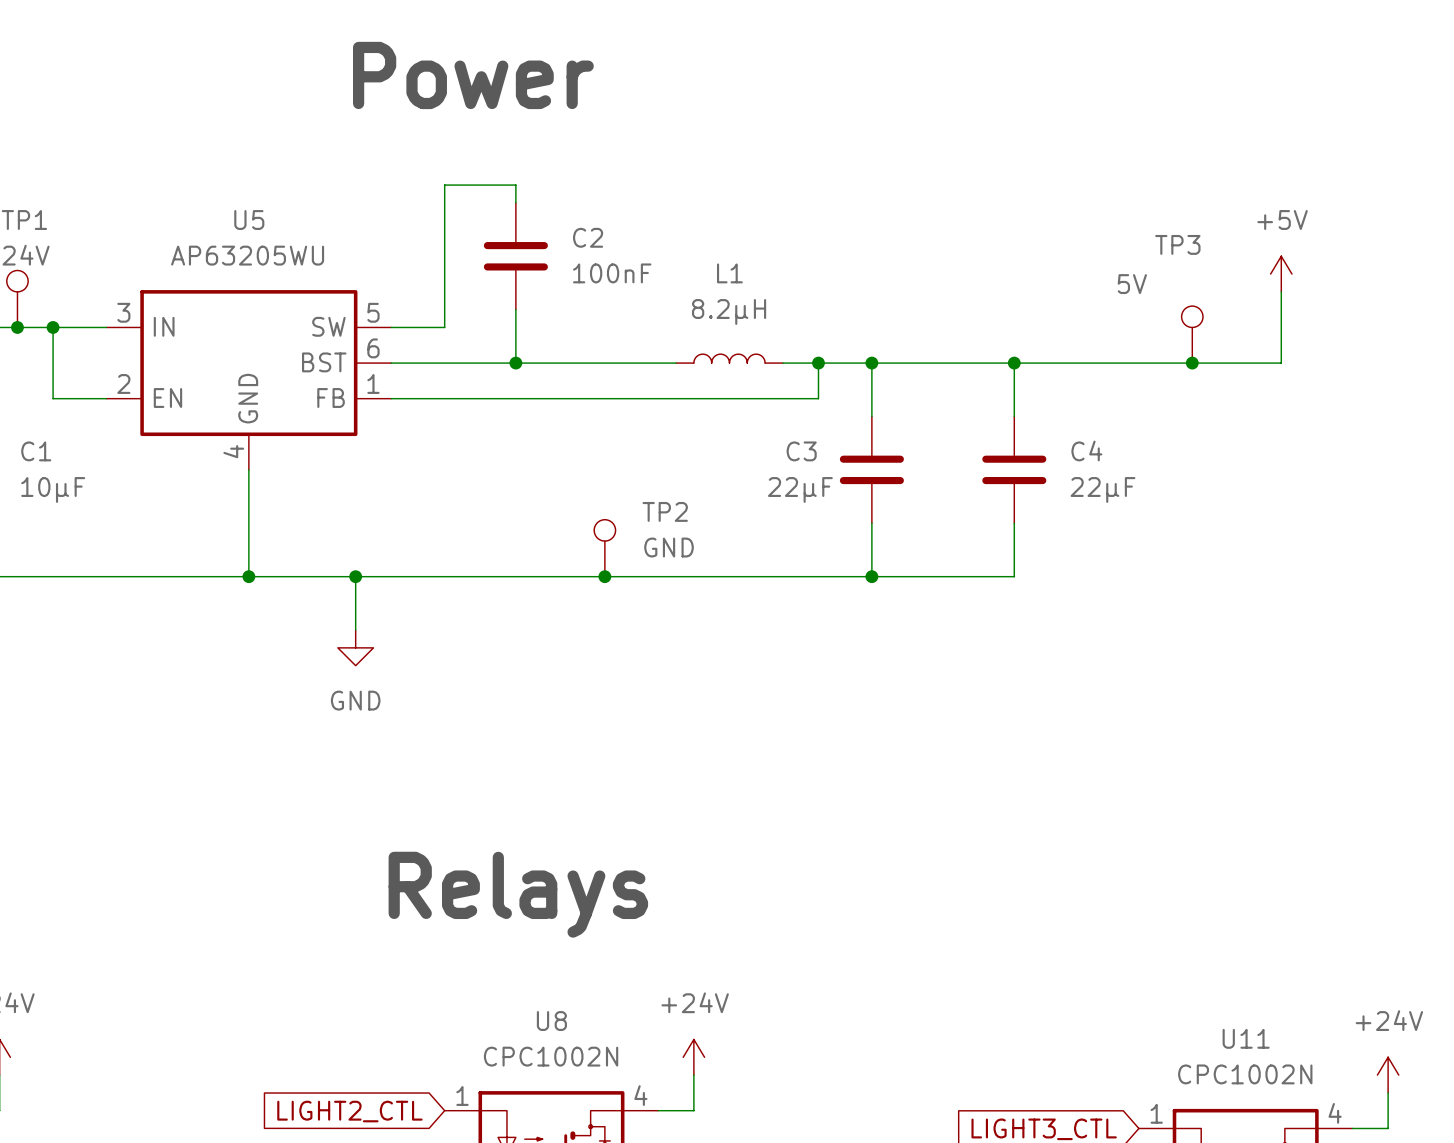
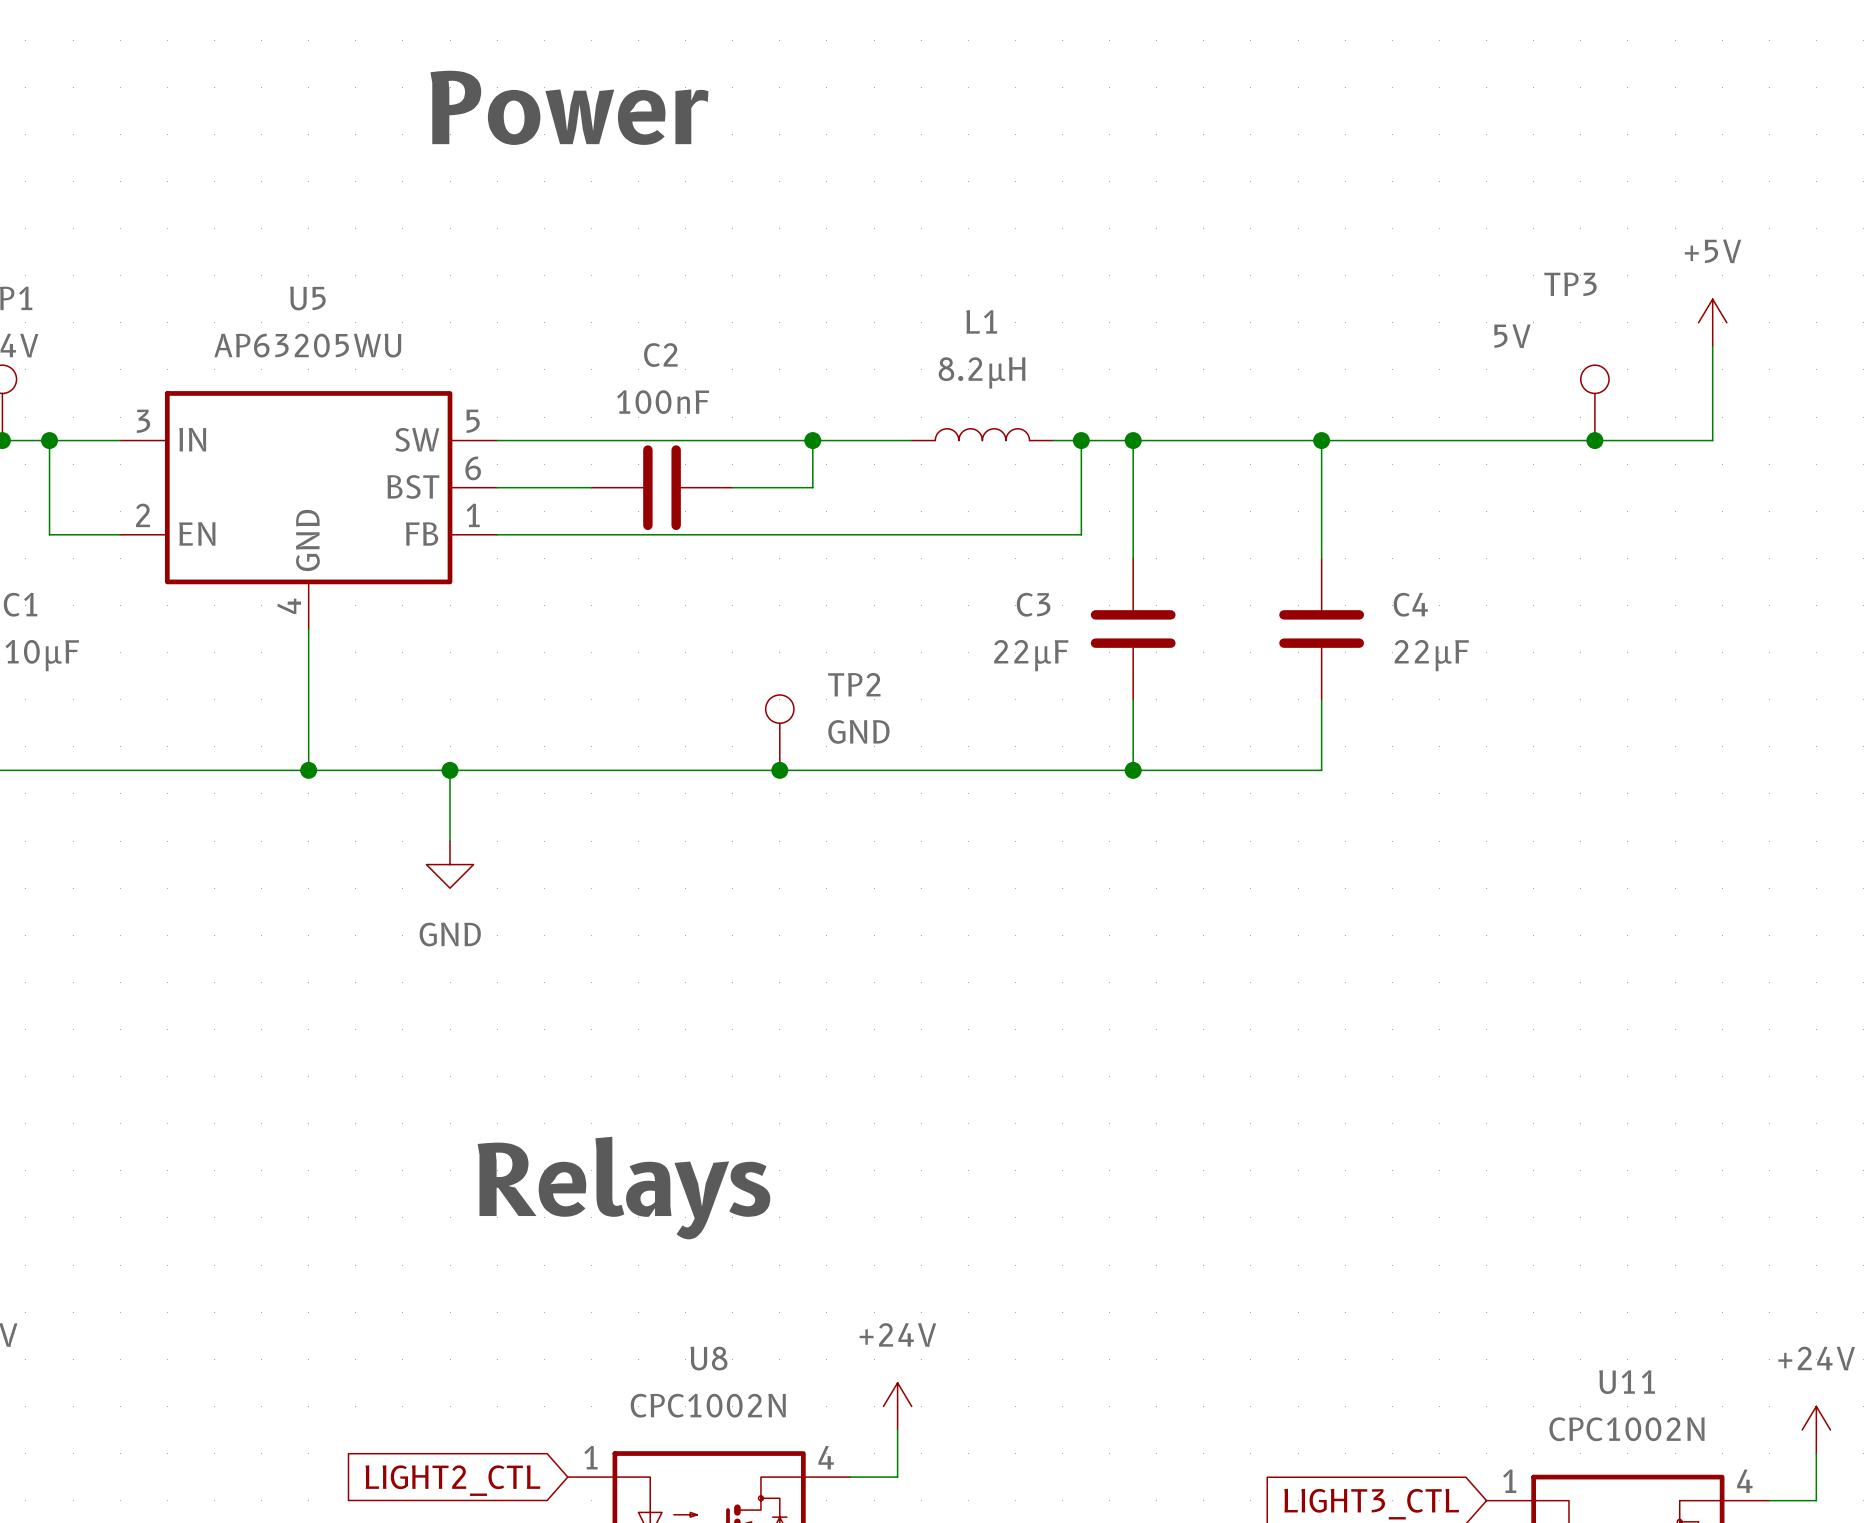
wire: (515, 202) (515, 185) (444, 185) (444, 327) -> (911, 440) (567, 440)
C2 name position: C2 (588, 237) -> C2 (660, 355)
C2 rotation: 0° (515, 256) -> 90° clockwise (662, 487)
C2 position: (515, 256) -> (662, 487)
C2 value position: 100nF (612, 273) -> 100nF (663, 402)
power symbol position: +5V (1281, 274) -> +5V (1712, 322)
wire: (1281, 291) (1281, 363) (782, 363) -> (1712, 346) (1712, 440) (1053, 440)
wire: (515, 309) (515, 363) -> none
junction: none -> (812, 440)
junction: none -> (1081, 440)
wire: none -> (1133, 440) (1133, 487)
junction: none -> (1133, 440)
wire: none -> (1321, 440) (1321, 487)
TP3 position: (1192, 334) -> (1594, 402)
L1 position: (729, 358) -> (982, 434)
junction: (515, 363) -> none
wire: (629, 363) (676, 363) -> (812, 487) (812, 440)
wire: (818, 363) (818, 398) -> (1081, 440) (1081, 534) (1062, 534)
junction: (818, 363) -> none
junction: (871, 363) -> none
junction position: (1014, 363) -> (1321, 440)
junction position: (1192, 363) -> (1594, 440)

